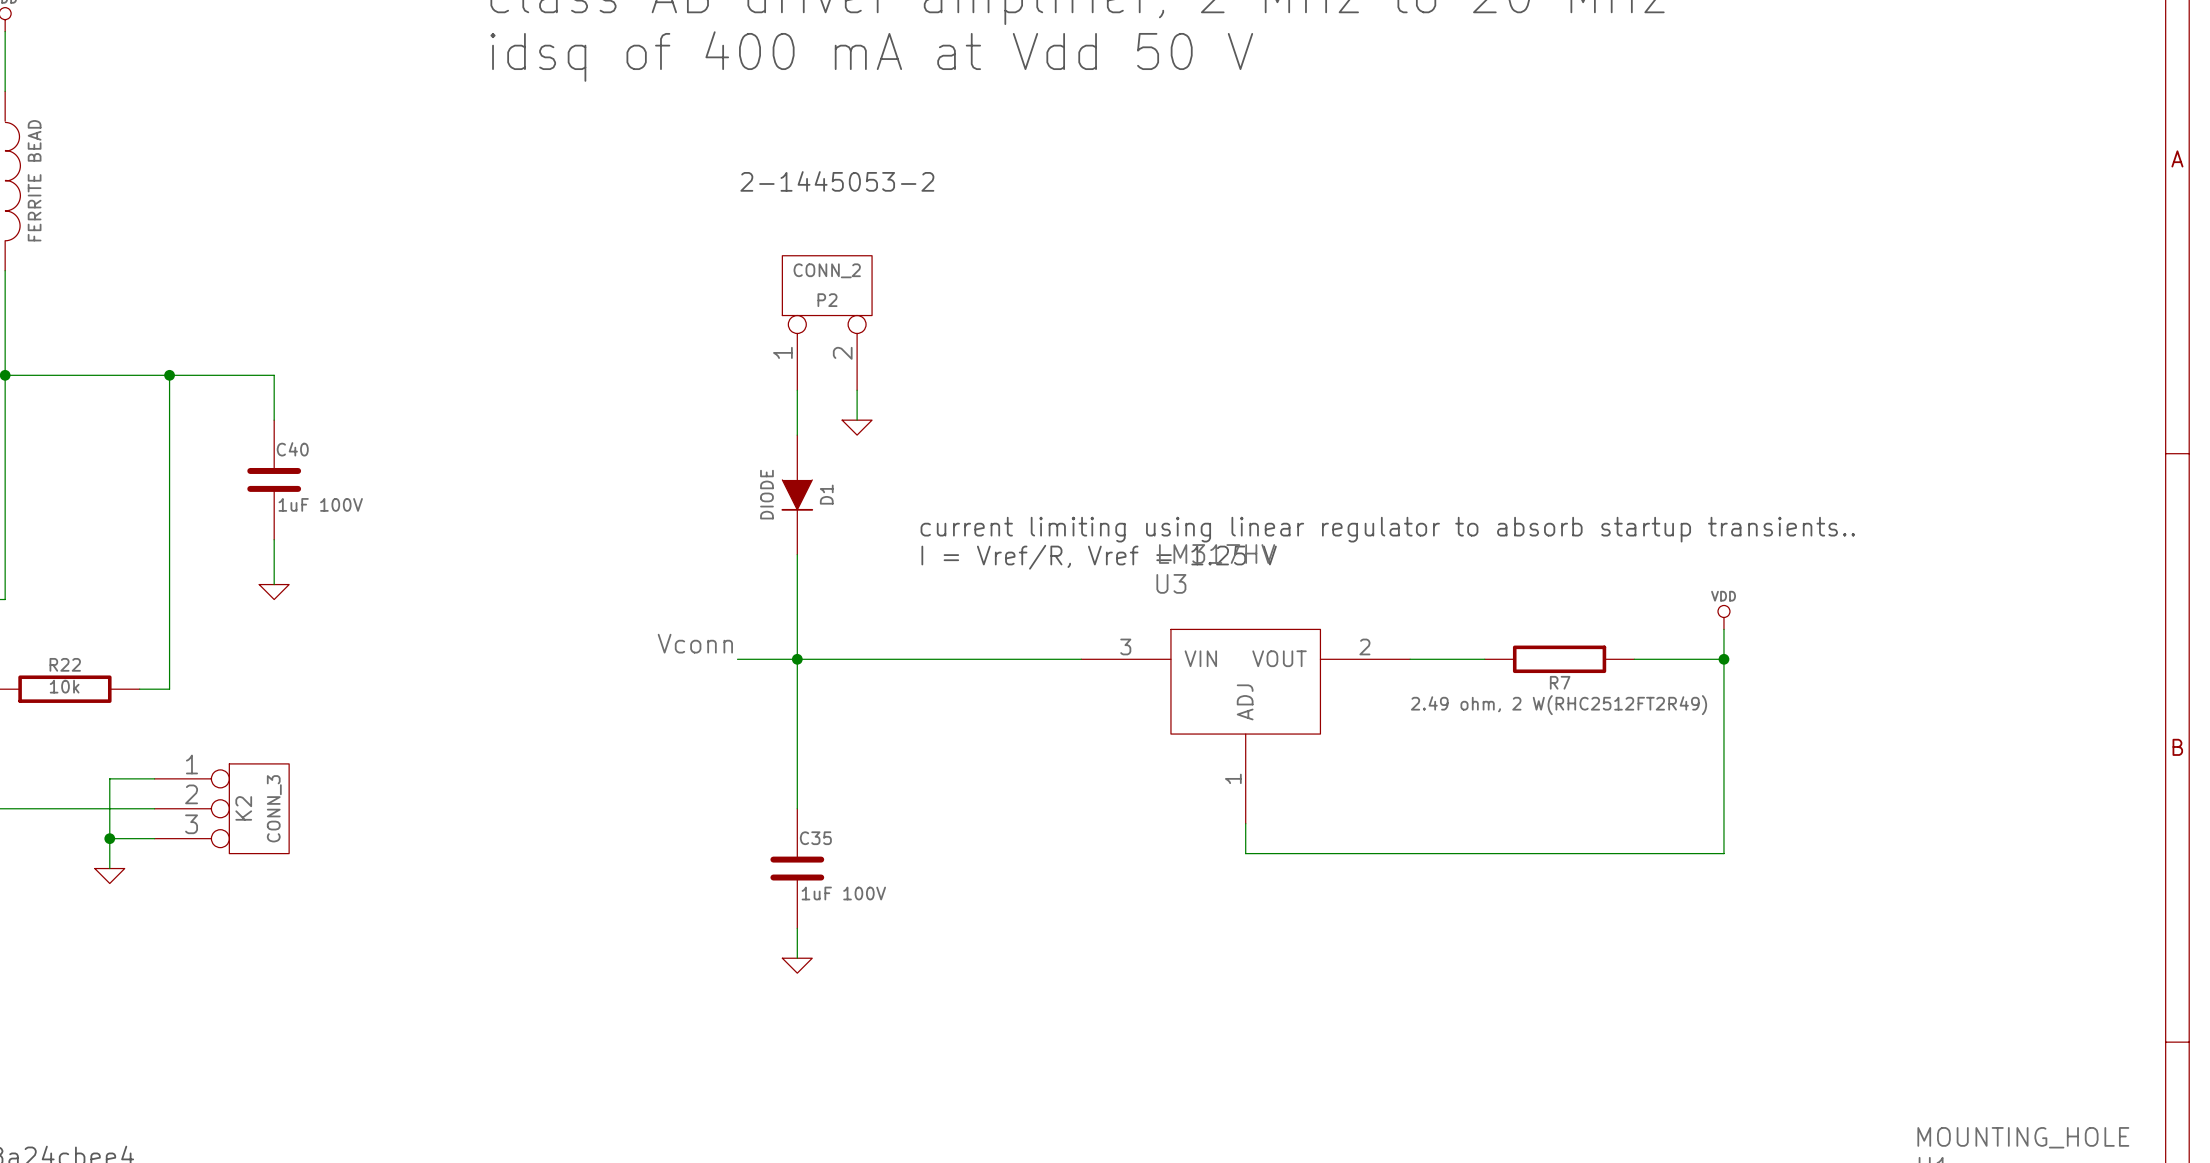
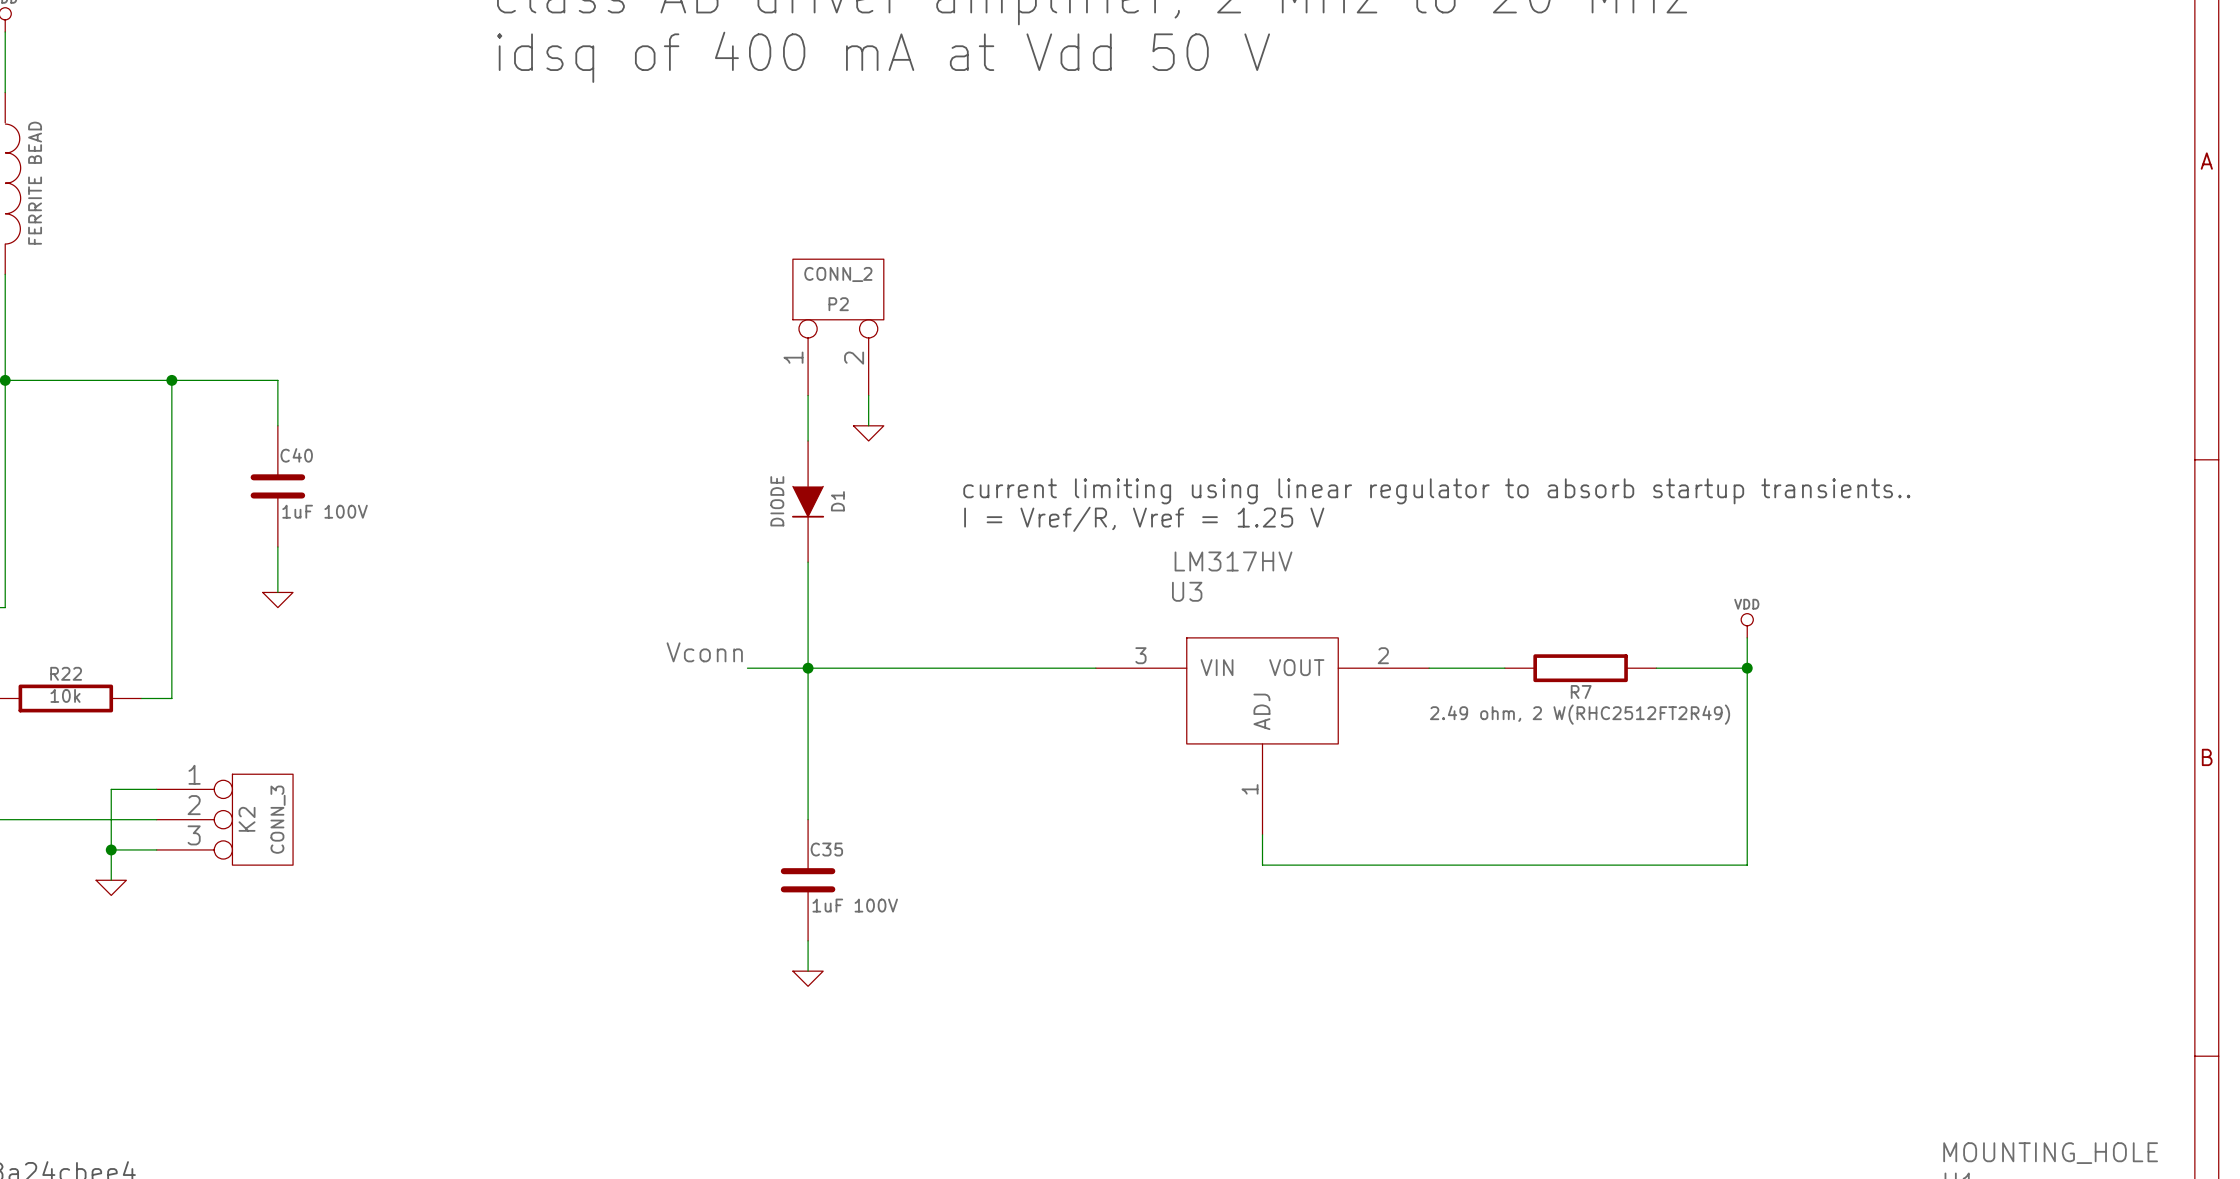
text: 2-1445053-2 (837, 181) -> none
text position: current limiting using linear regulator to absorb startup transients.. (1387, 529) -> current limiting using linear regulator to absorb startup transients.. (1436, 491)
text position: I = Vref/R, Vref = 1.25 V (1099, 557) -> I = Vref/R, Vref = 1.25 V (1144, 519)

